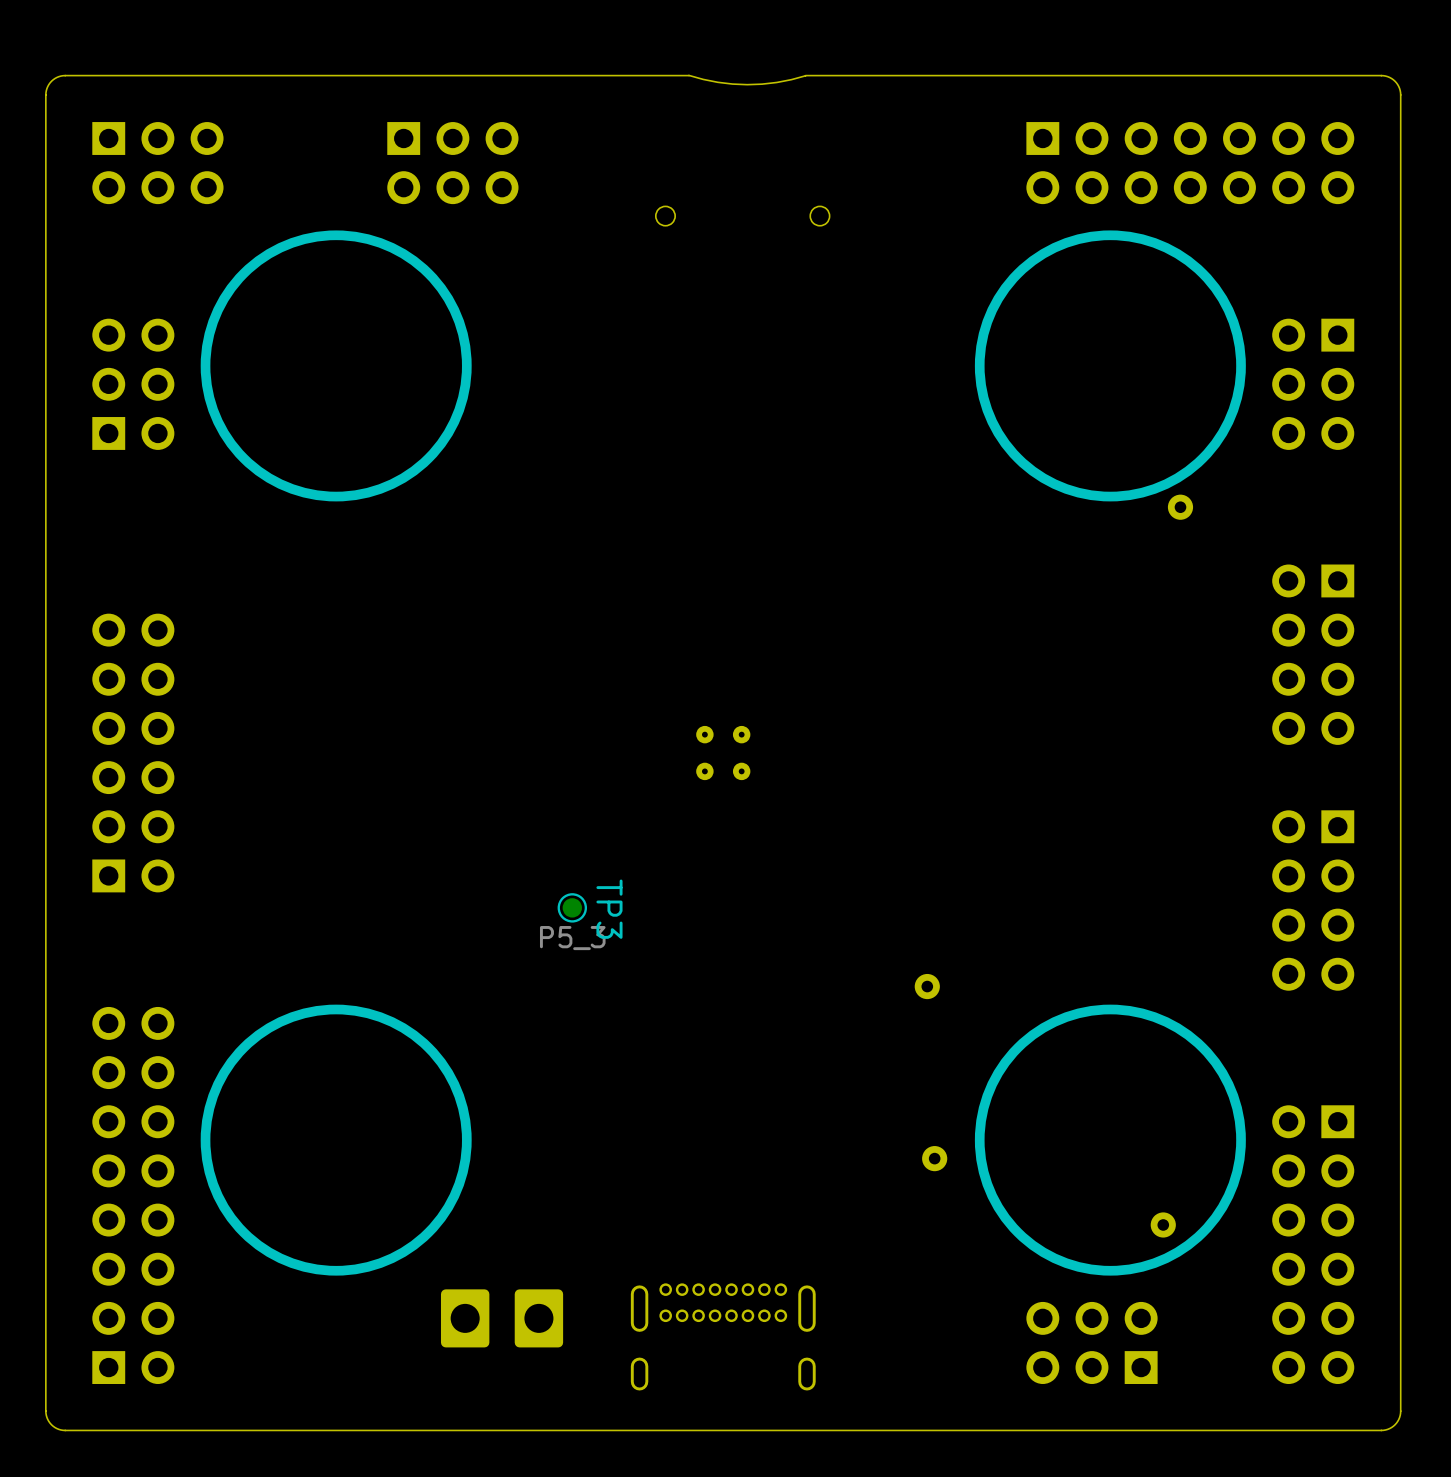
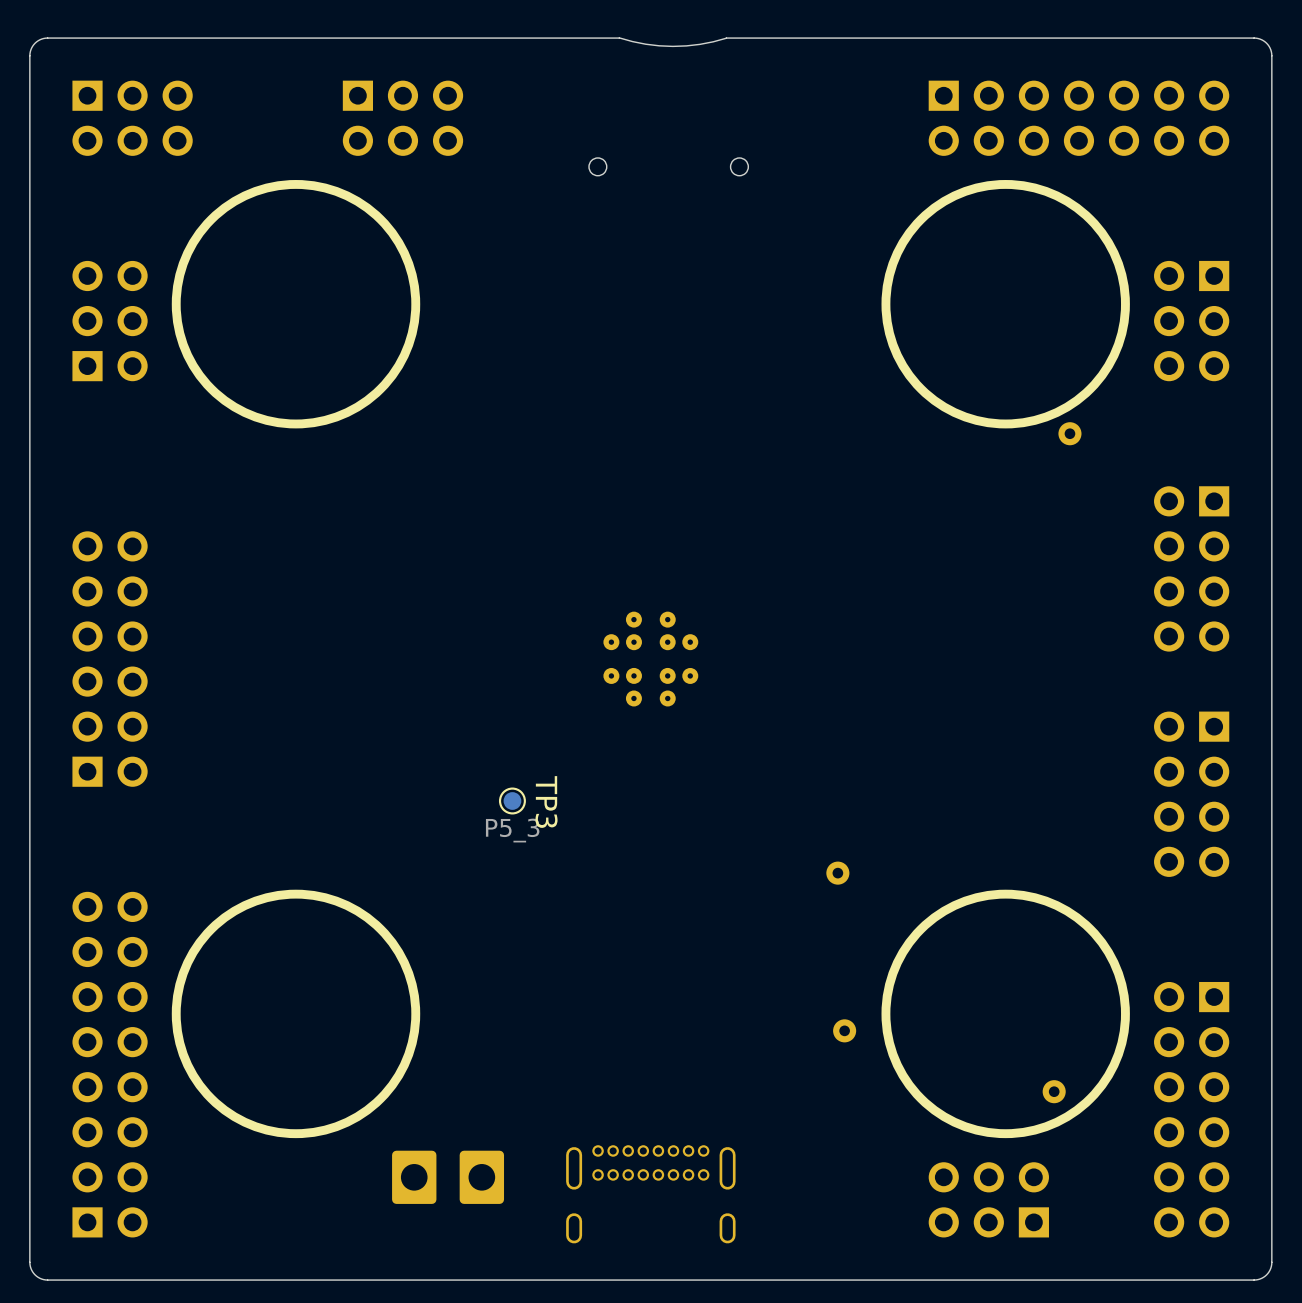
part footprint: [696, 725, 751, 781] -> [603, 611, 699, 707]

